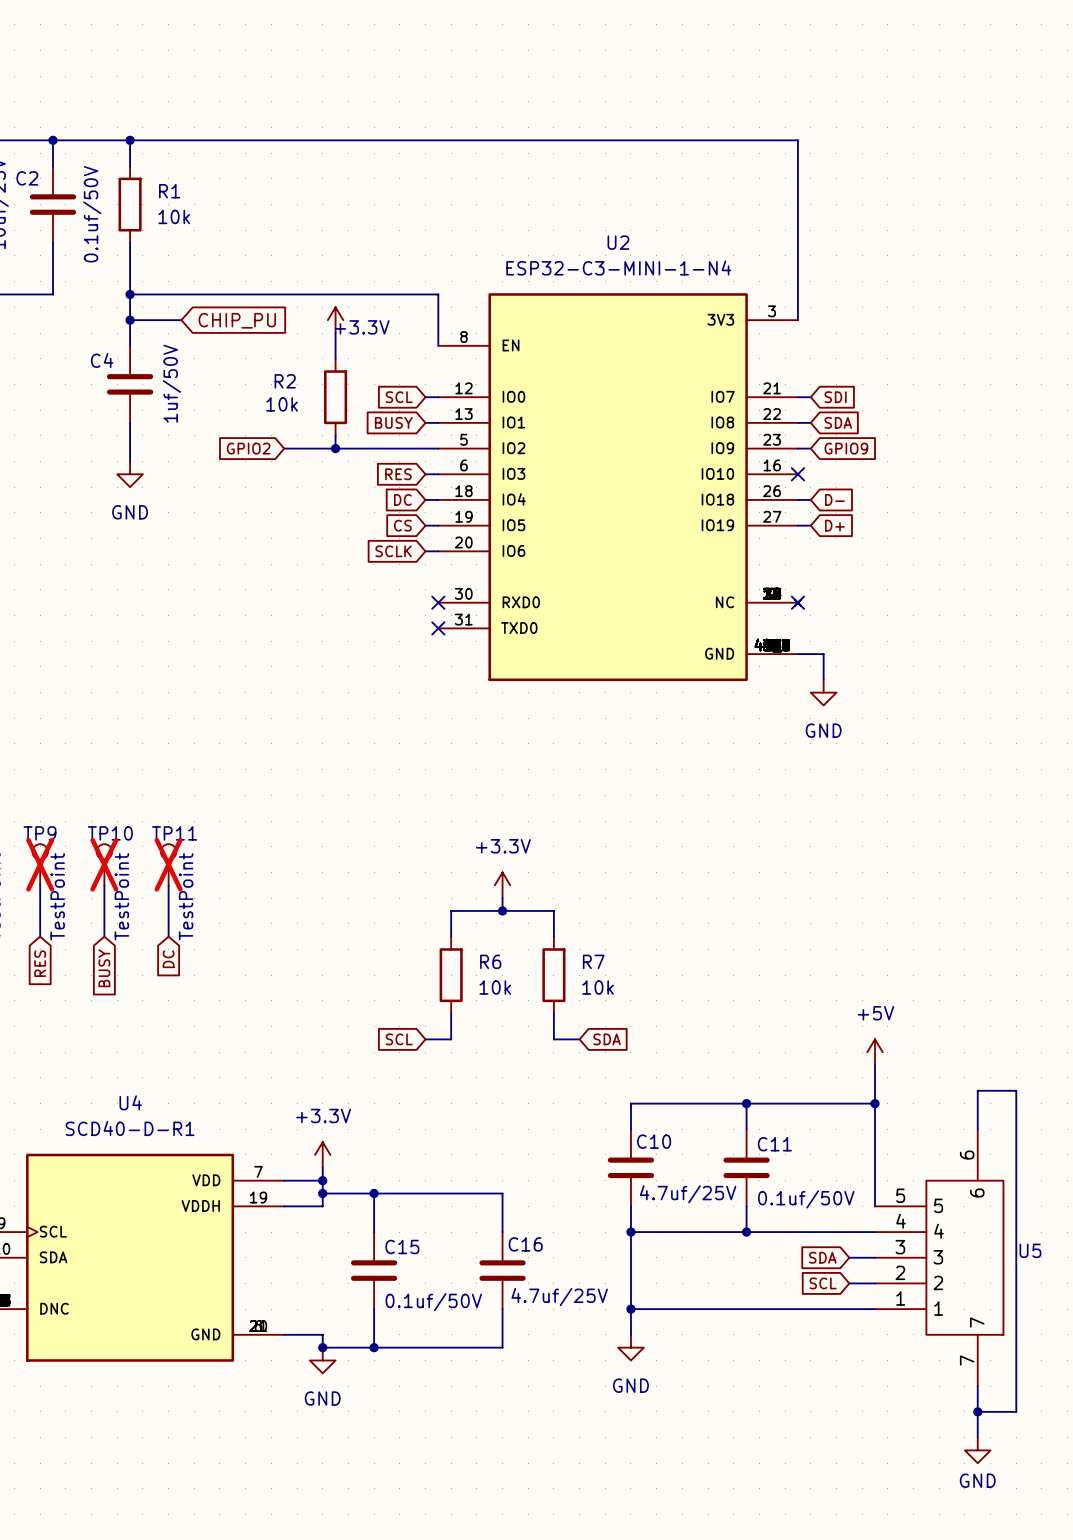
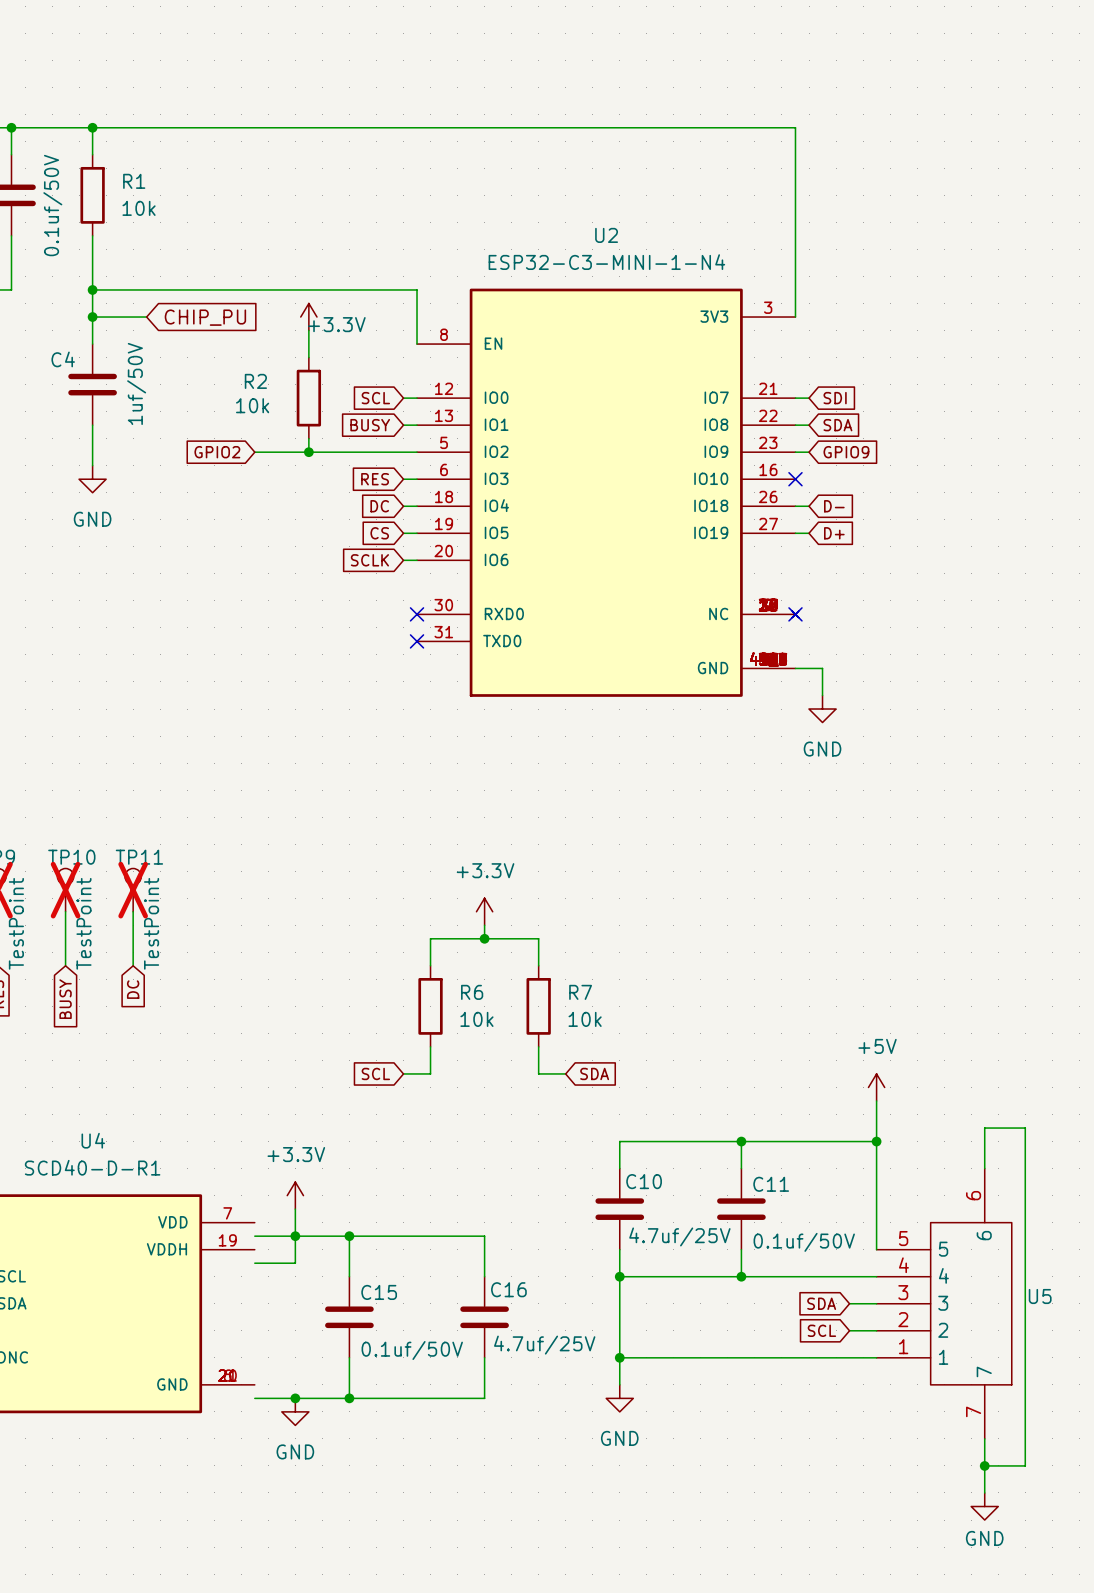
wire: (284, 1180) (322, 1180) -> (254, 1236) (295, 1236)
junction: (322, 1180) -> none
wire: (284, 1206) (322, 1206) -> (254, 1263) (295, 1263) (295, 1249)
wire: (284, 1334) (322, 1334) (322, 1347) -> (254, 1398) (295, 1398)

